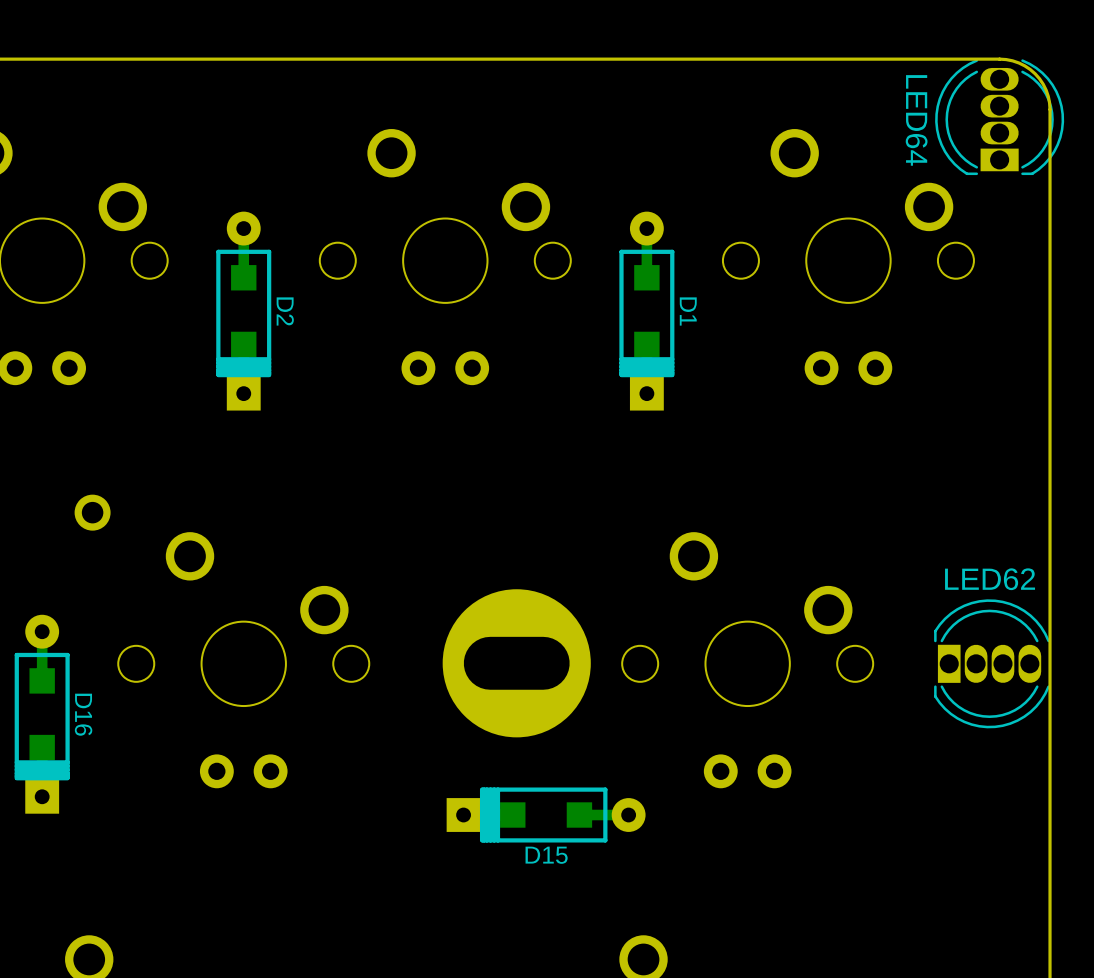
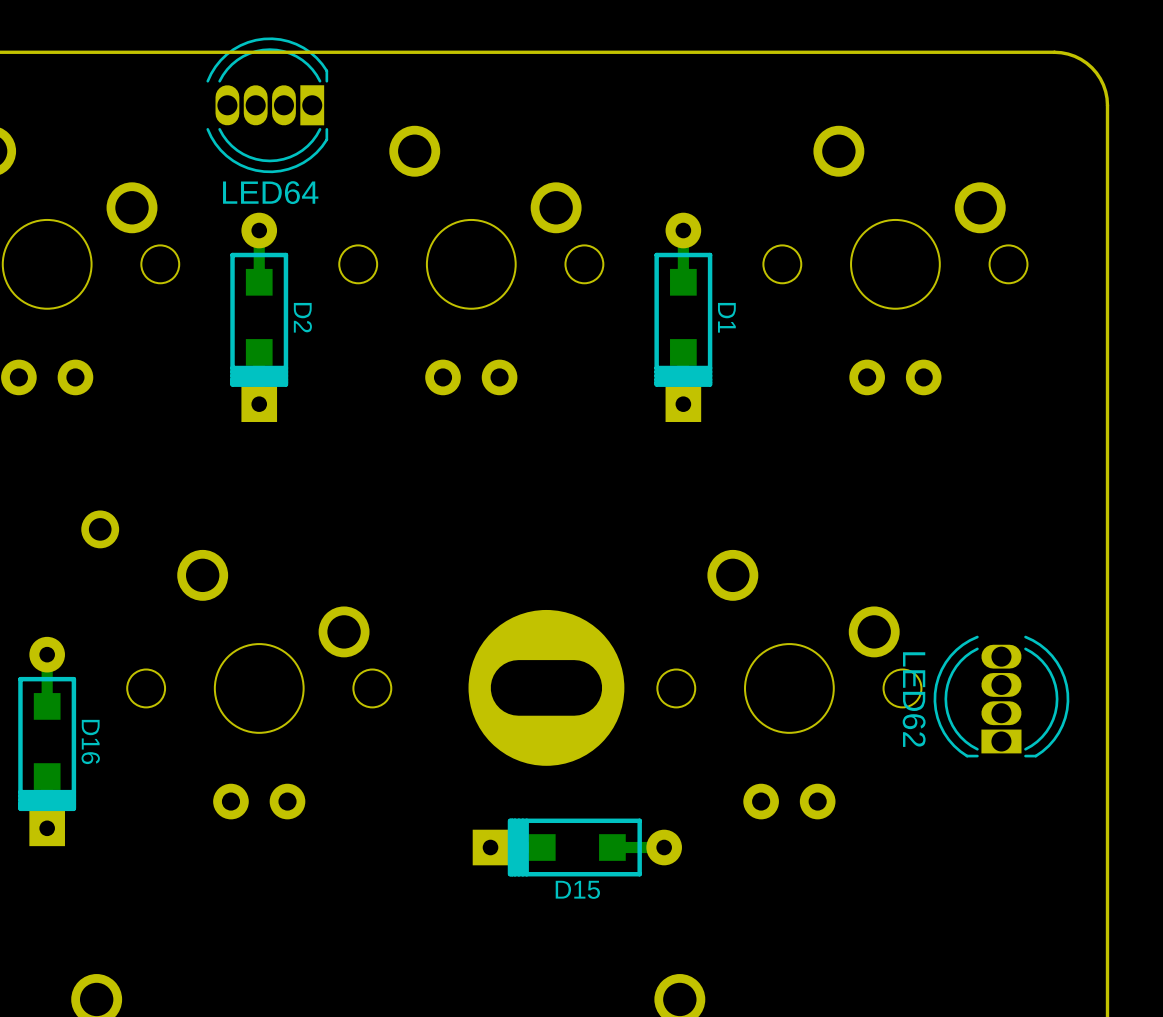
LED64 rotation: 0° (999, 117) -> 90° counterclockwise (267, 105)
LED64 position: (999, 117) -> (267, 105)
LED62 rotation: 0° (991, 663) -> 90° counterclockwise (1001, 696)

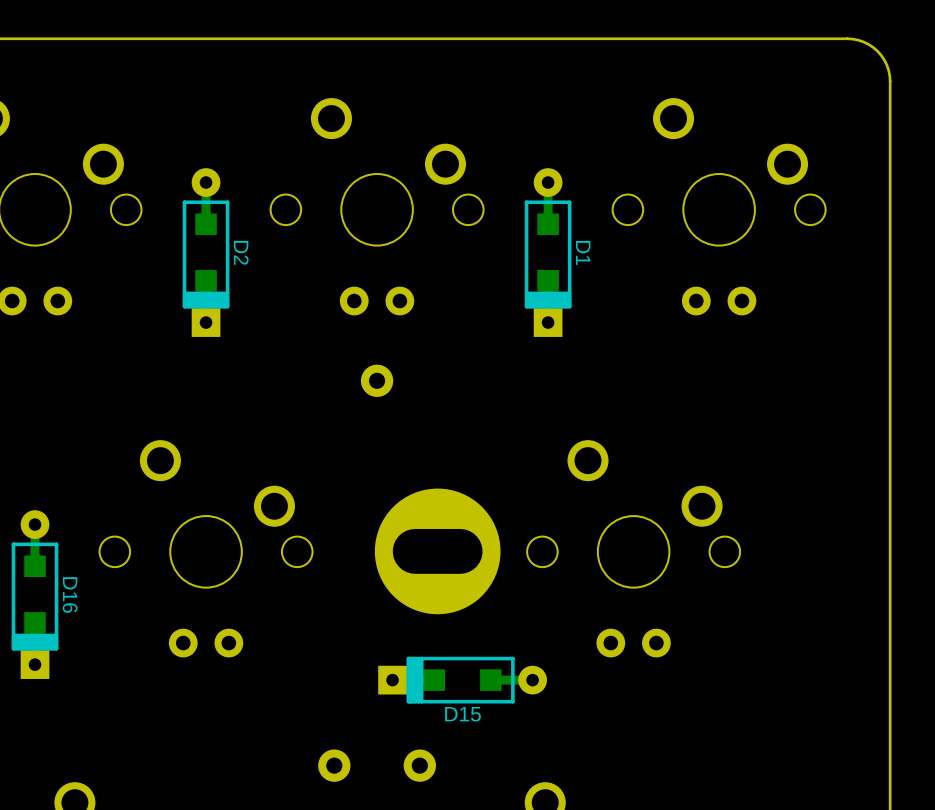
LED64: (267, 105) -> none
part: none -> (377, 380)
part: (100, 529) -> none
LED62: (1001, 696) -> none
part: none -> (334, 765)
part: none -> (419, 765)

